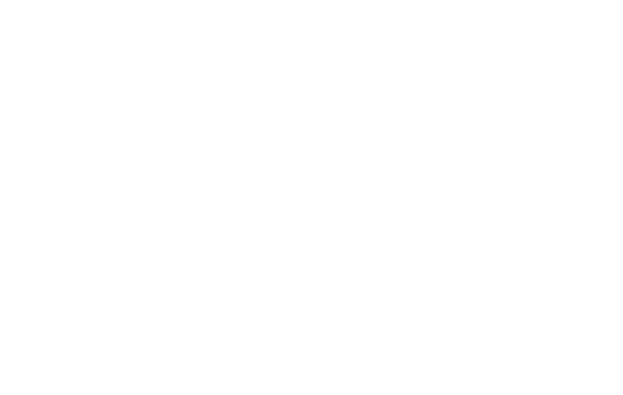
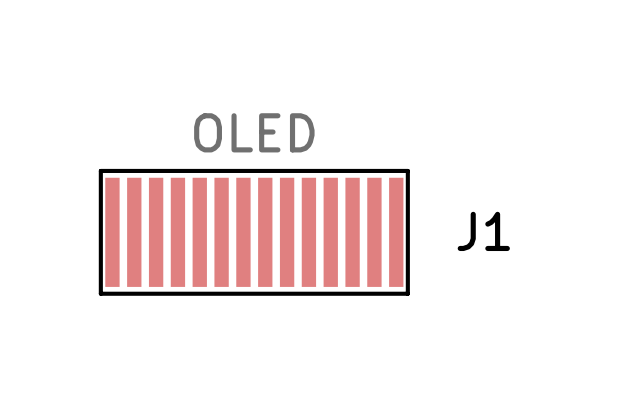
J1: none -> OLED (254, 232)

